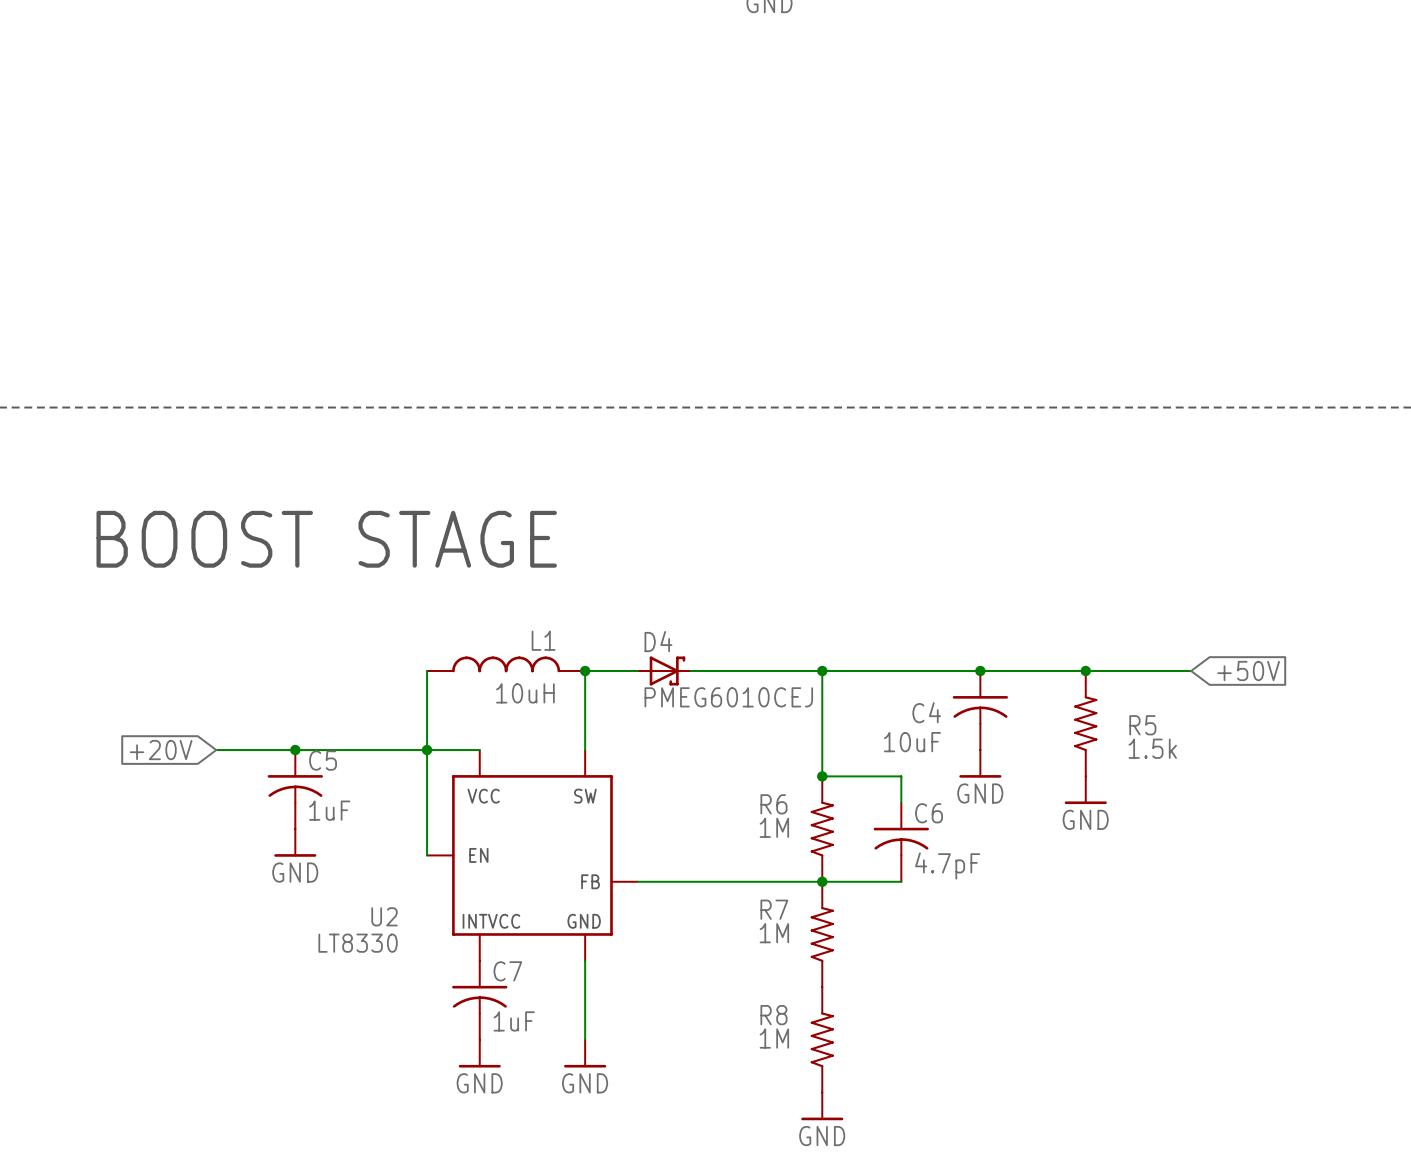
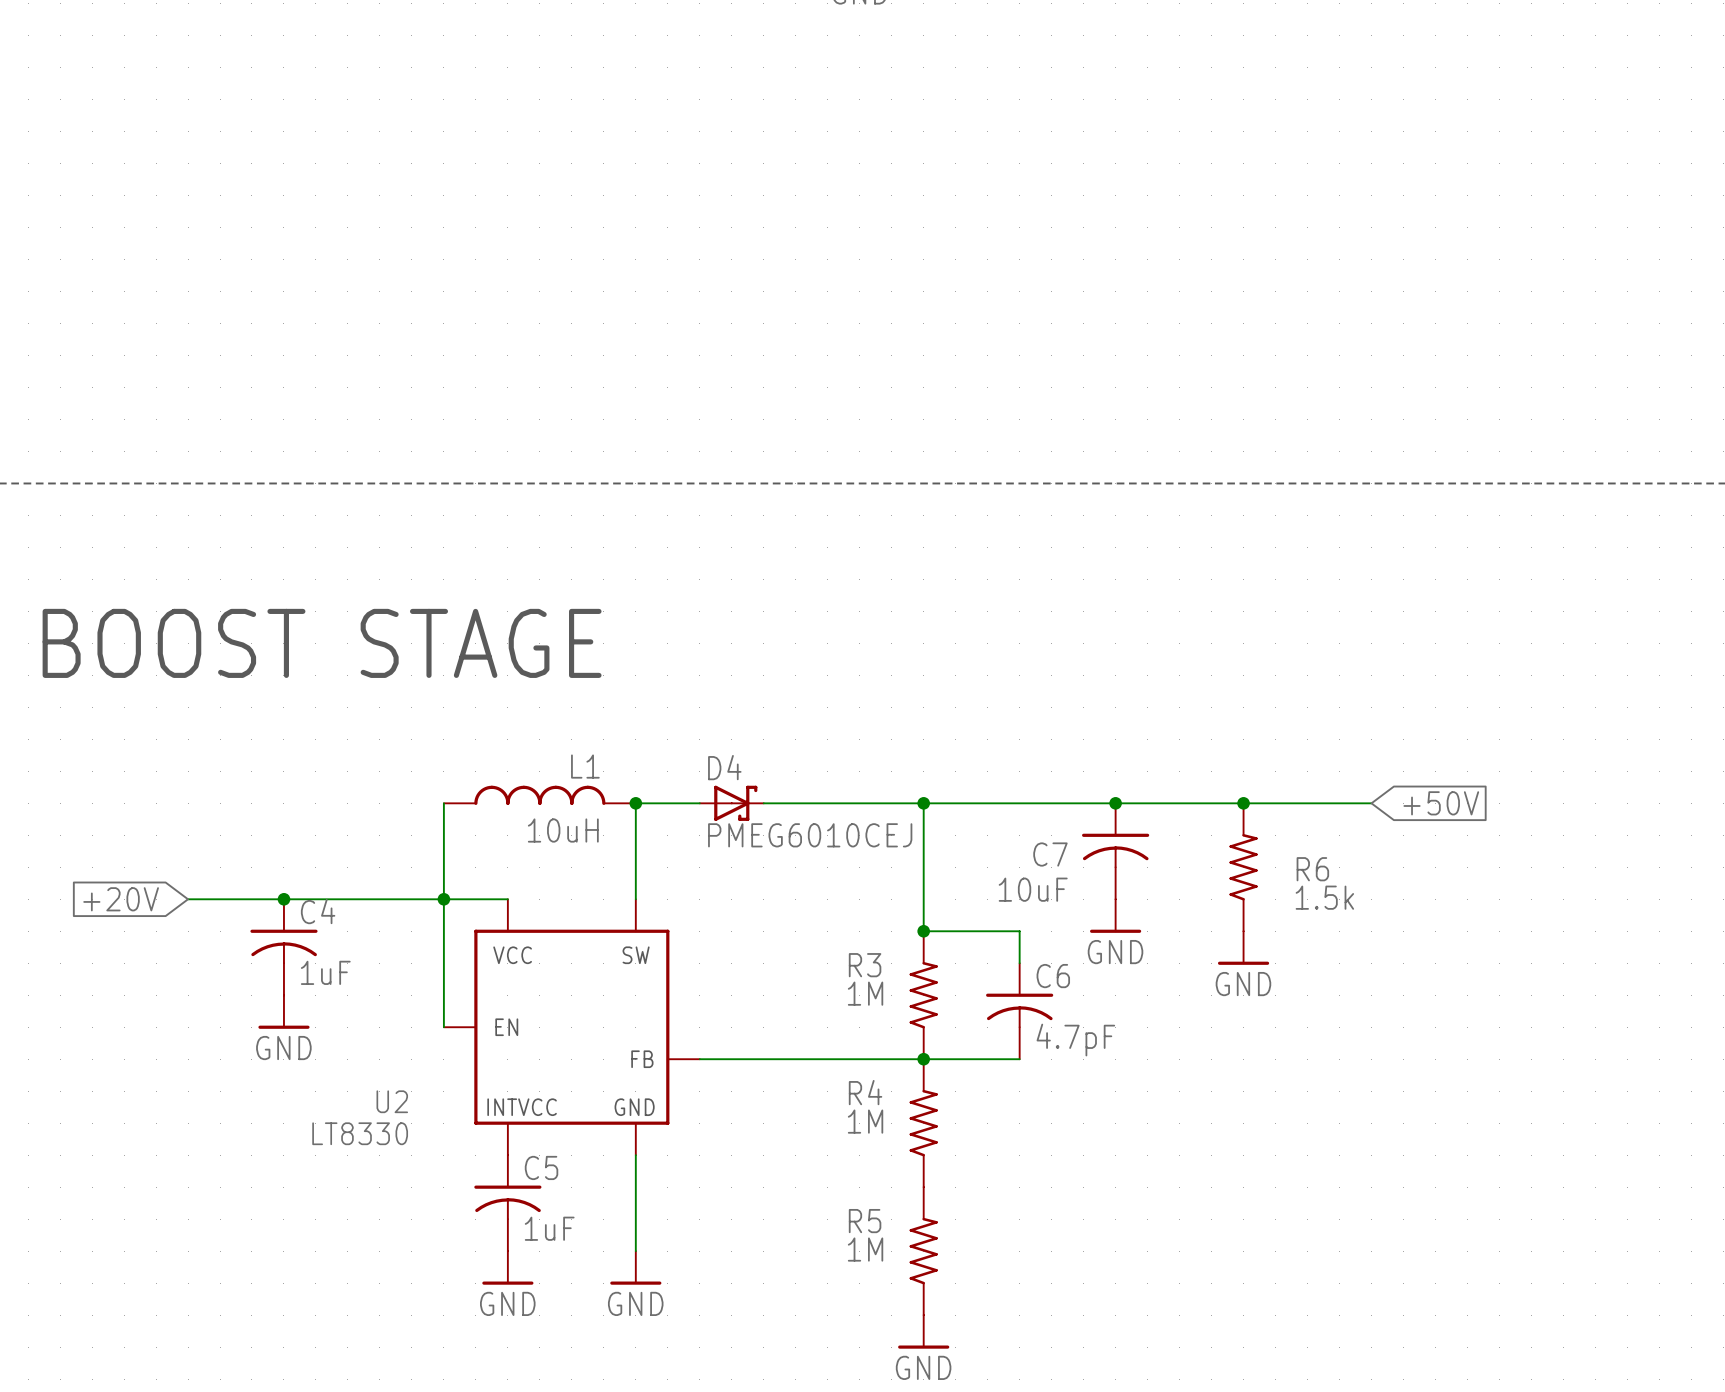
C4 name: C4 (926, 712) -> C7 (1050, 854)
R5 name: R5 (1142, 725) -> R6 (1312, 869)
C5 name: C5 (323, 760) -> C4 (318, 911)
R6 name: R6 (773, 804) -> R3 (865, 965)
R7 name: R7 (774, 909) -> R4 (865, 1092)
C7 name: C7 (507, 971) -> C5 (541, 1167)
R8 name: R8 (773, 1015) -> R5 (865, 1221)

